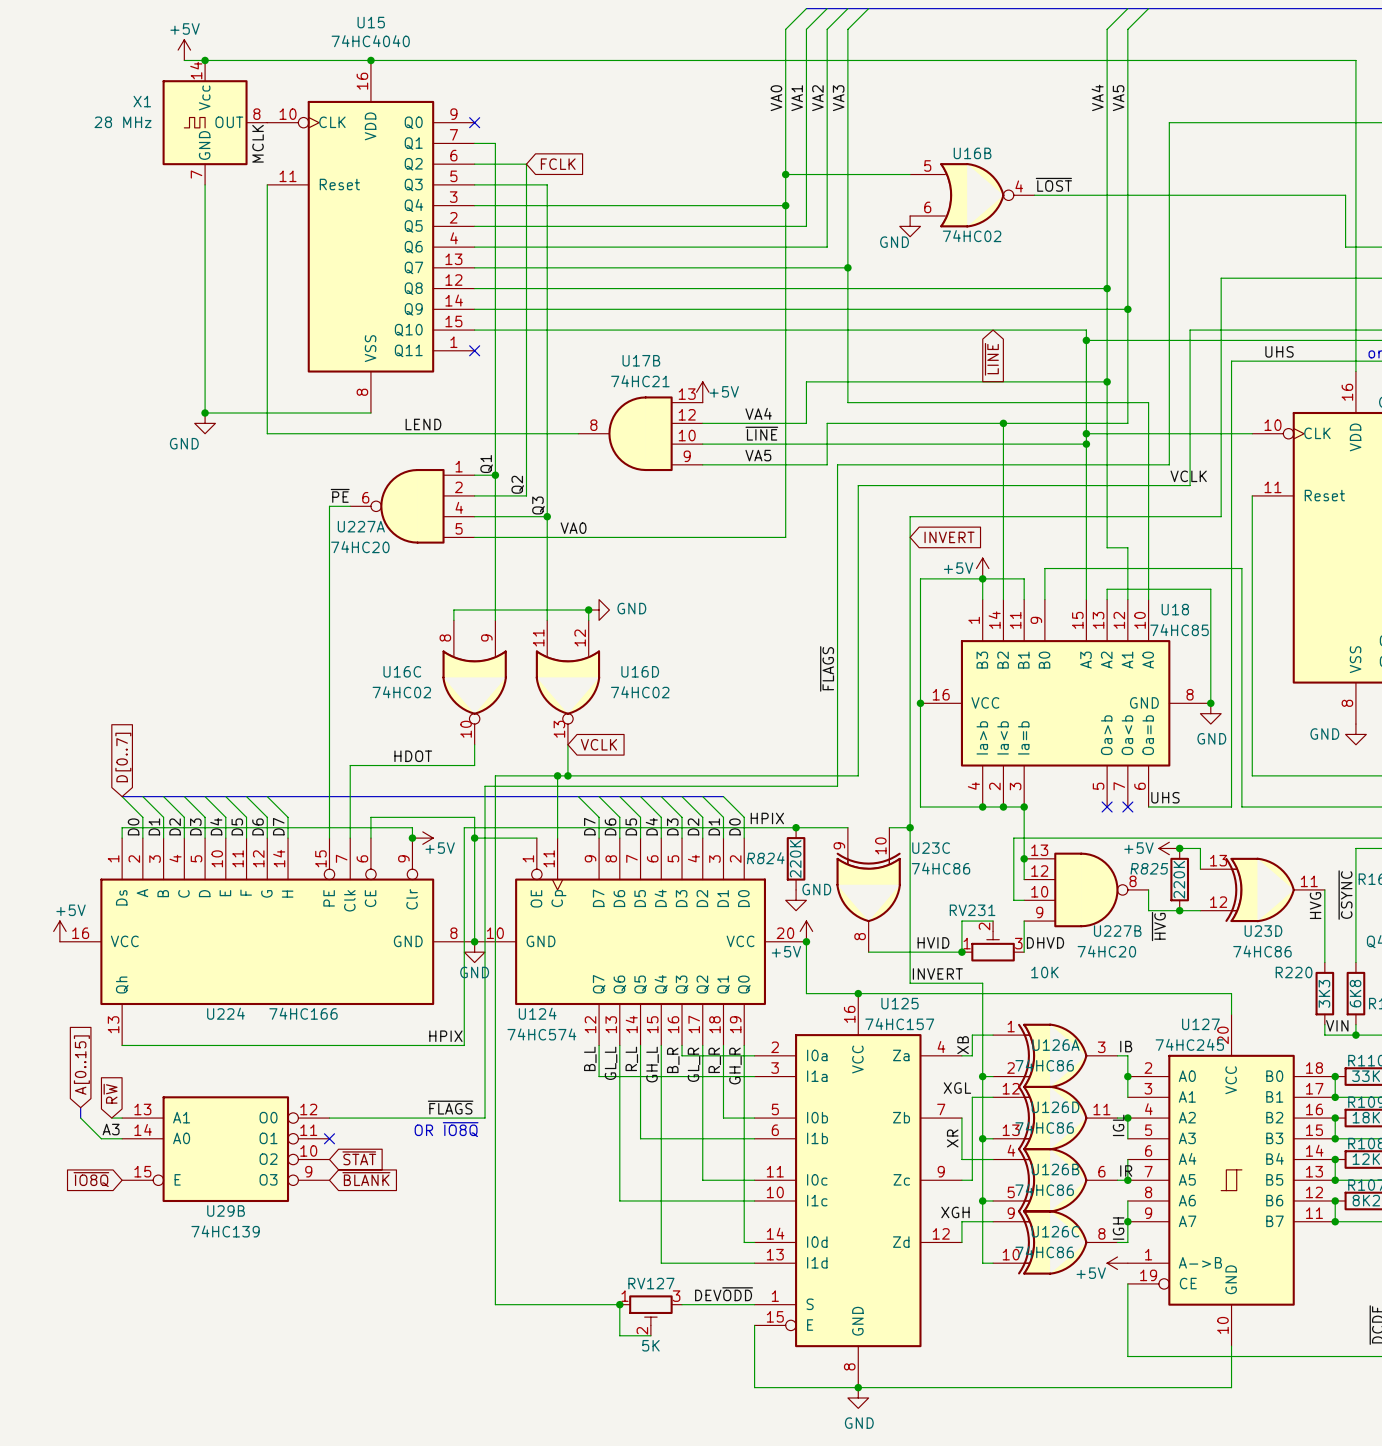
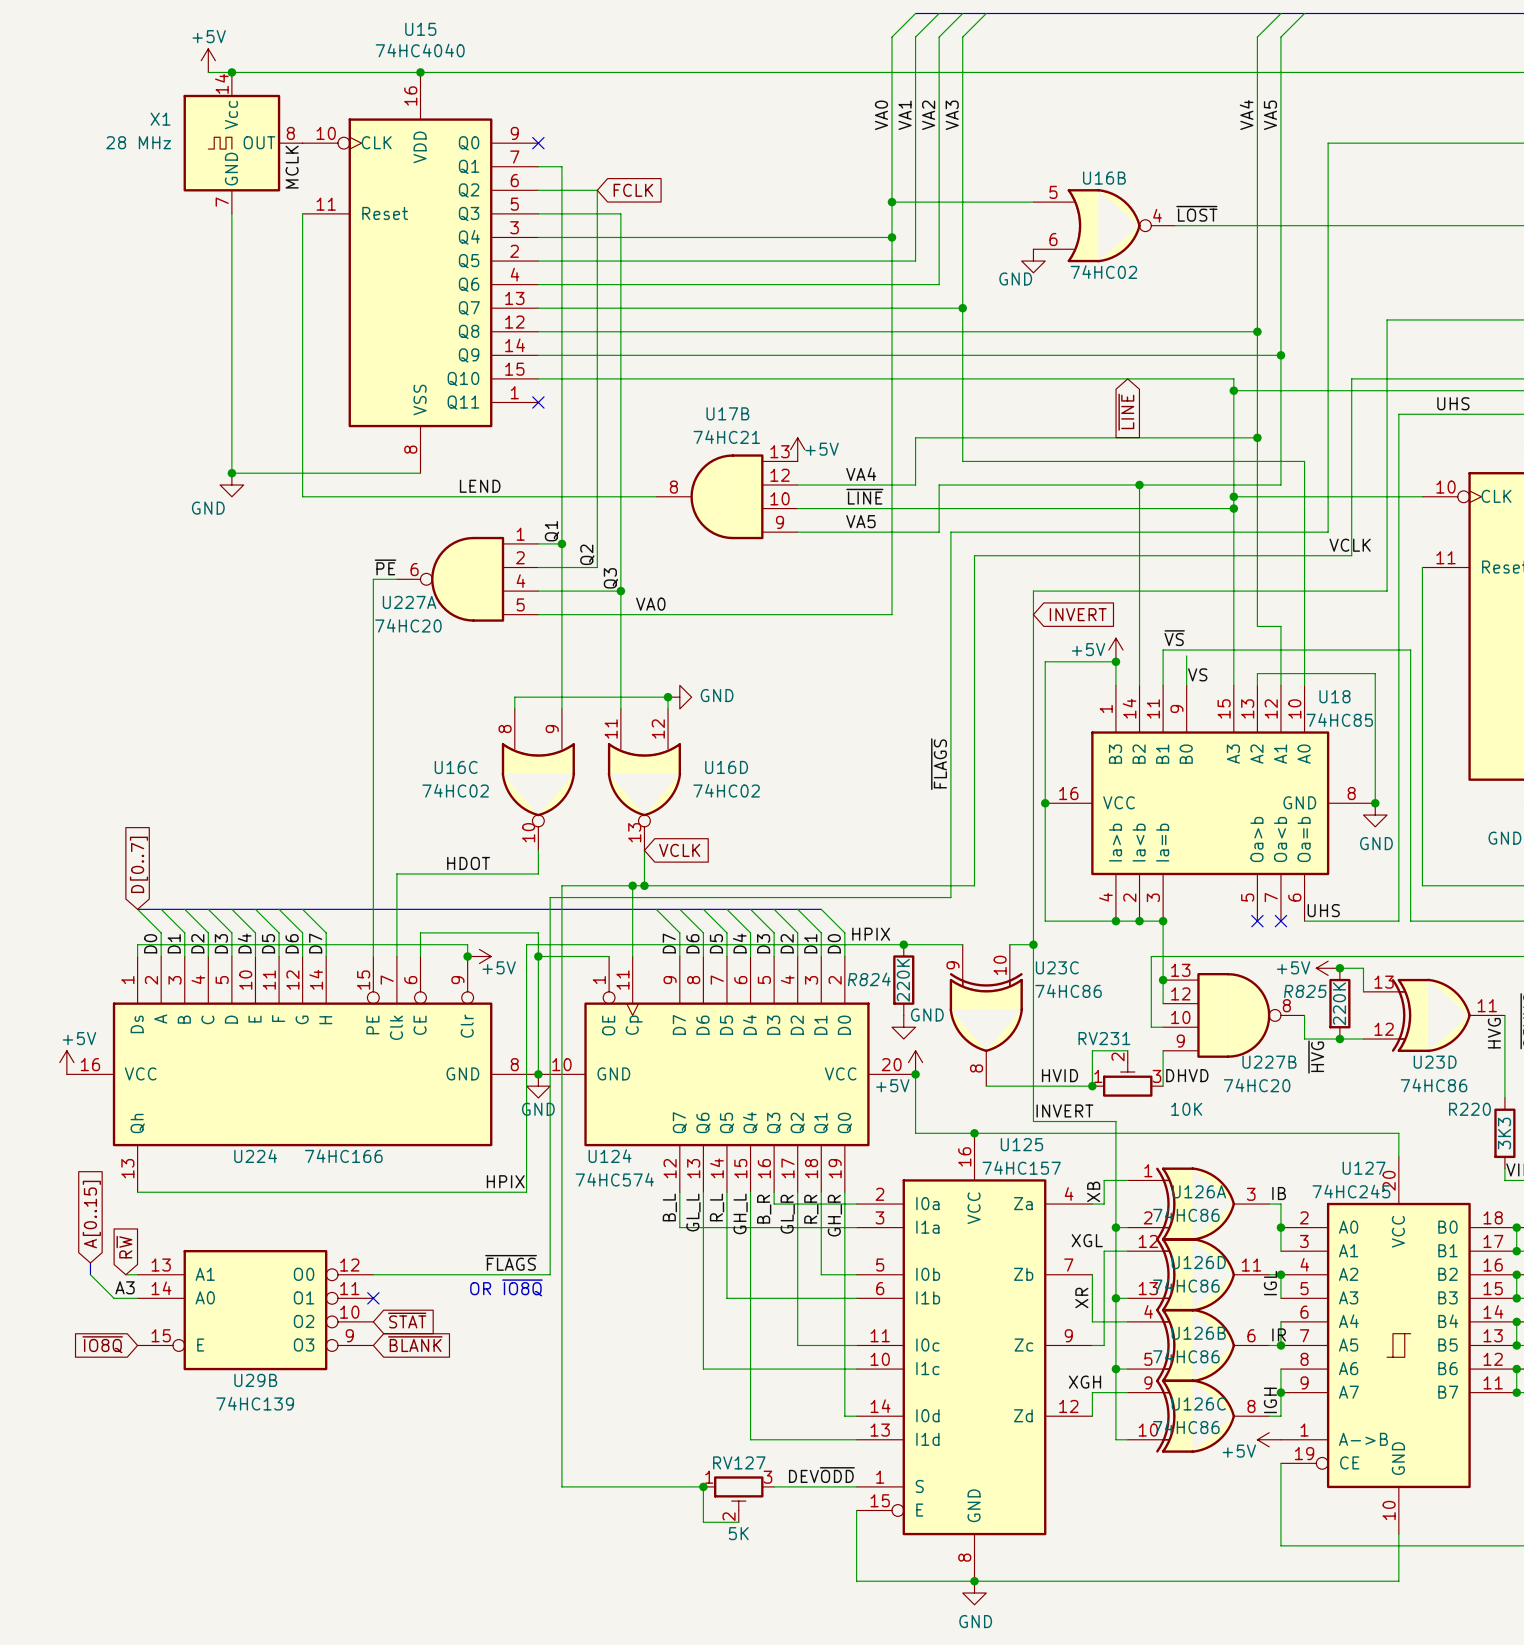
label: none -> ~{VS} (1174, 638)
wire: (1044, 568) (1044, 573) -> (1186, 650) (1163, 650) (1163, 661)
wire: (982, 578) (1024, 578) -> none
label: none -> VS (1197, 674)

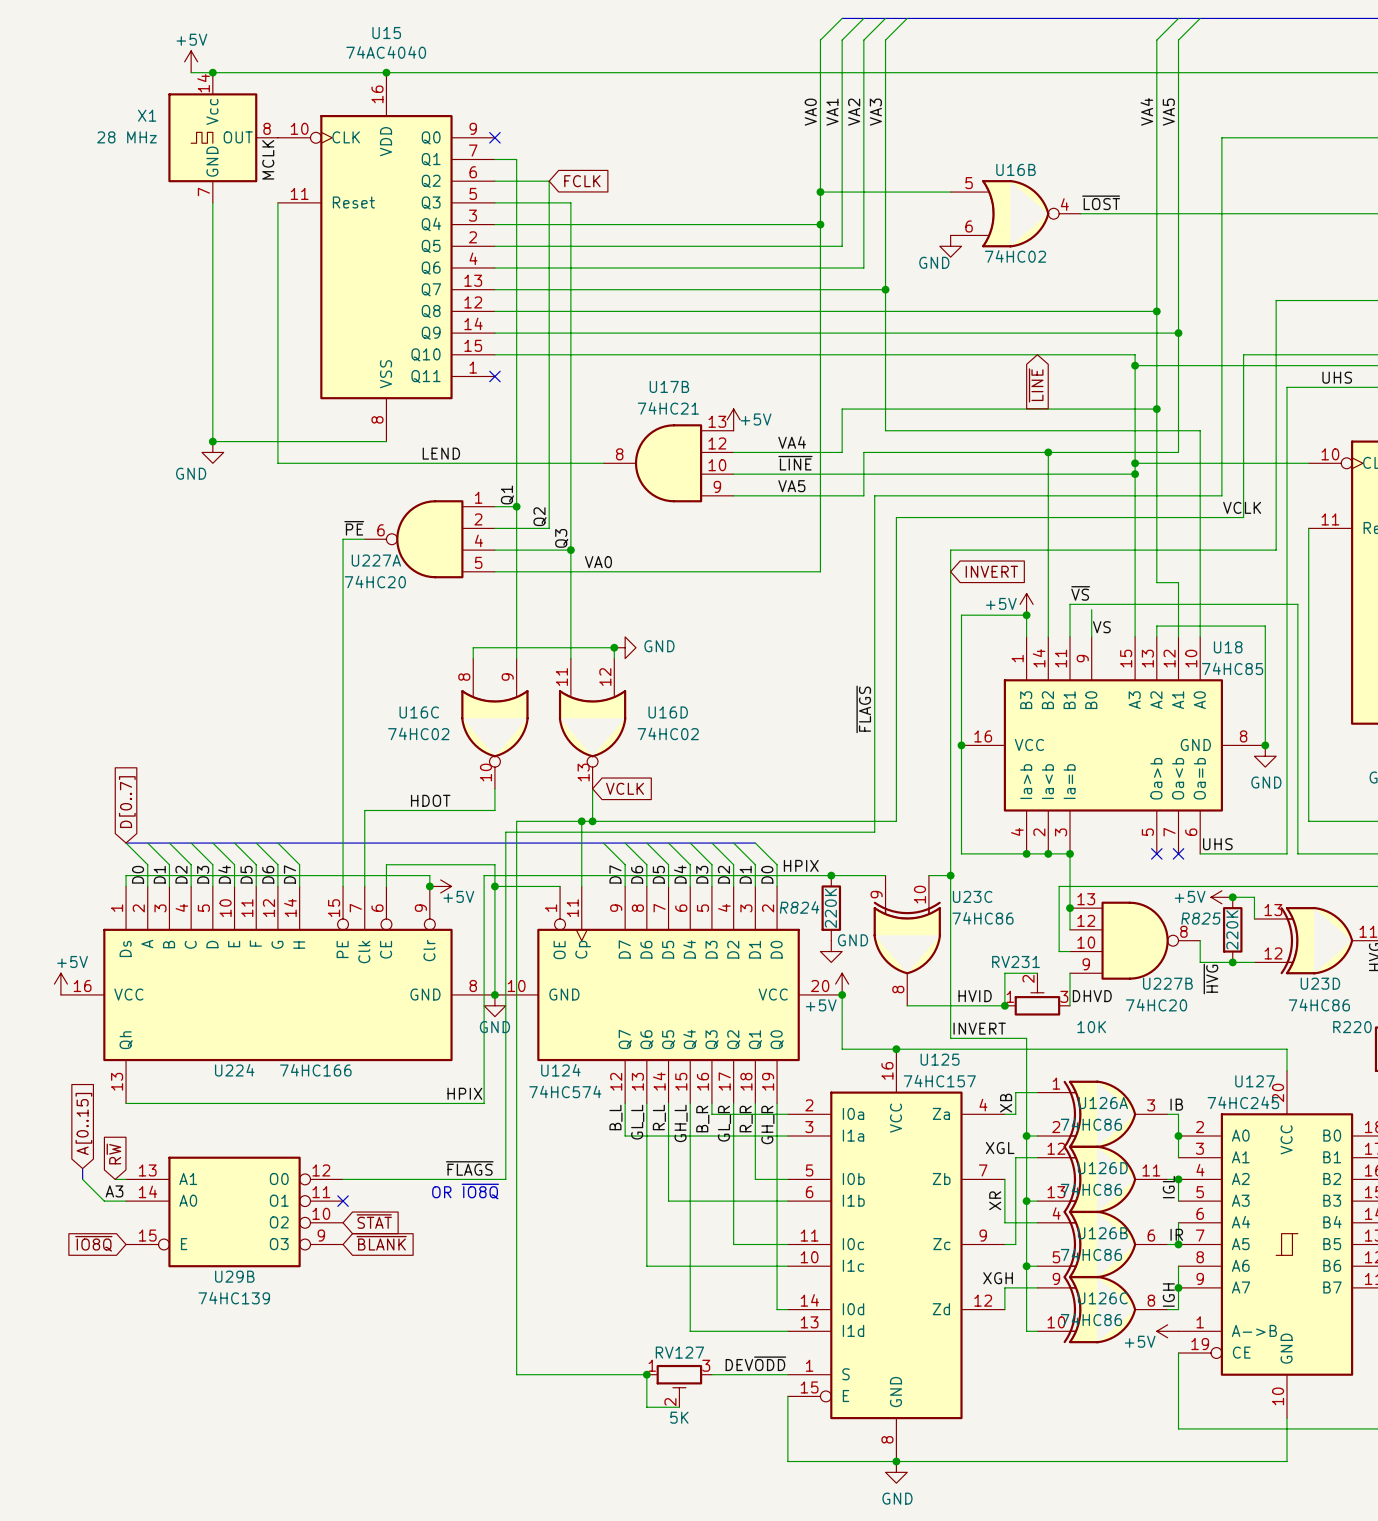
U15 value: 74HC4040 (420, 50) -> 74AC4040 (386, 52)

